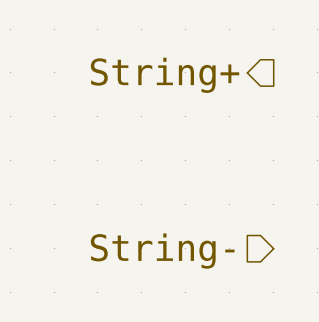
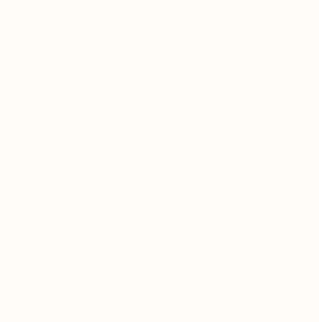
hierarchical label: String+ (165, 75) -> none
hierarchical label: String- (162, 251) -> none

